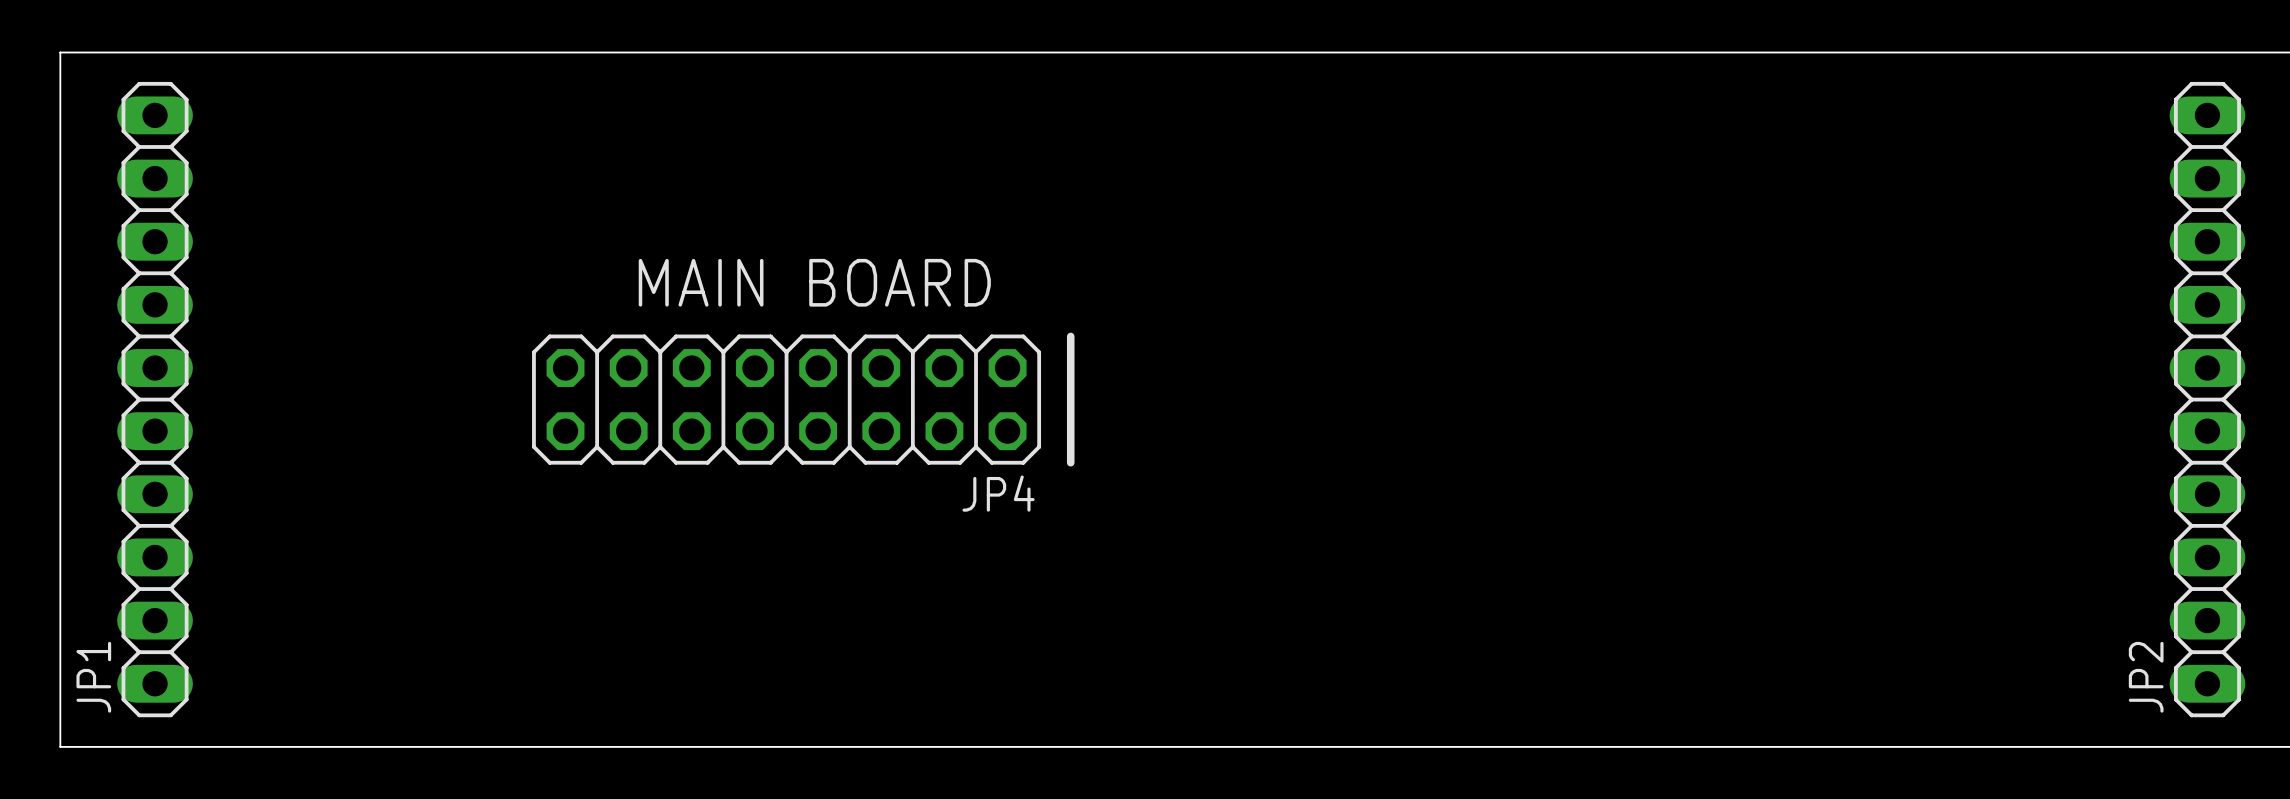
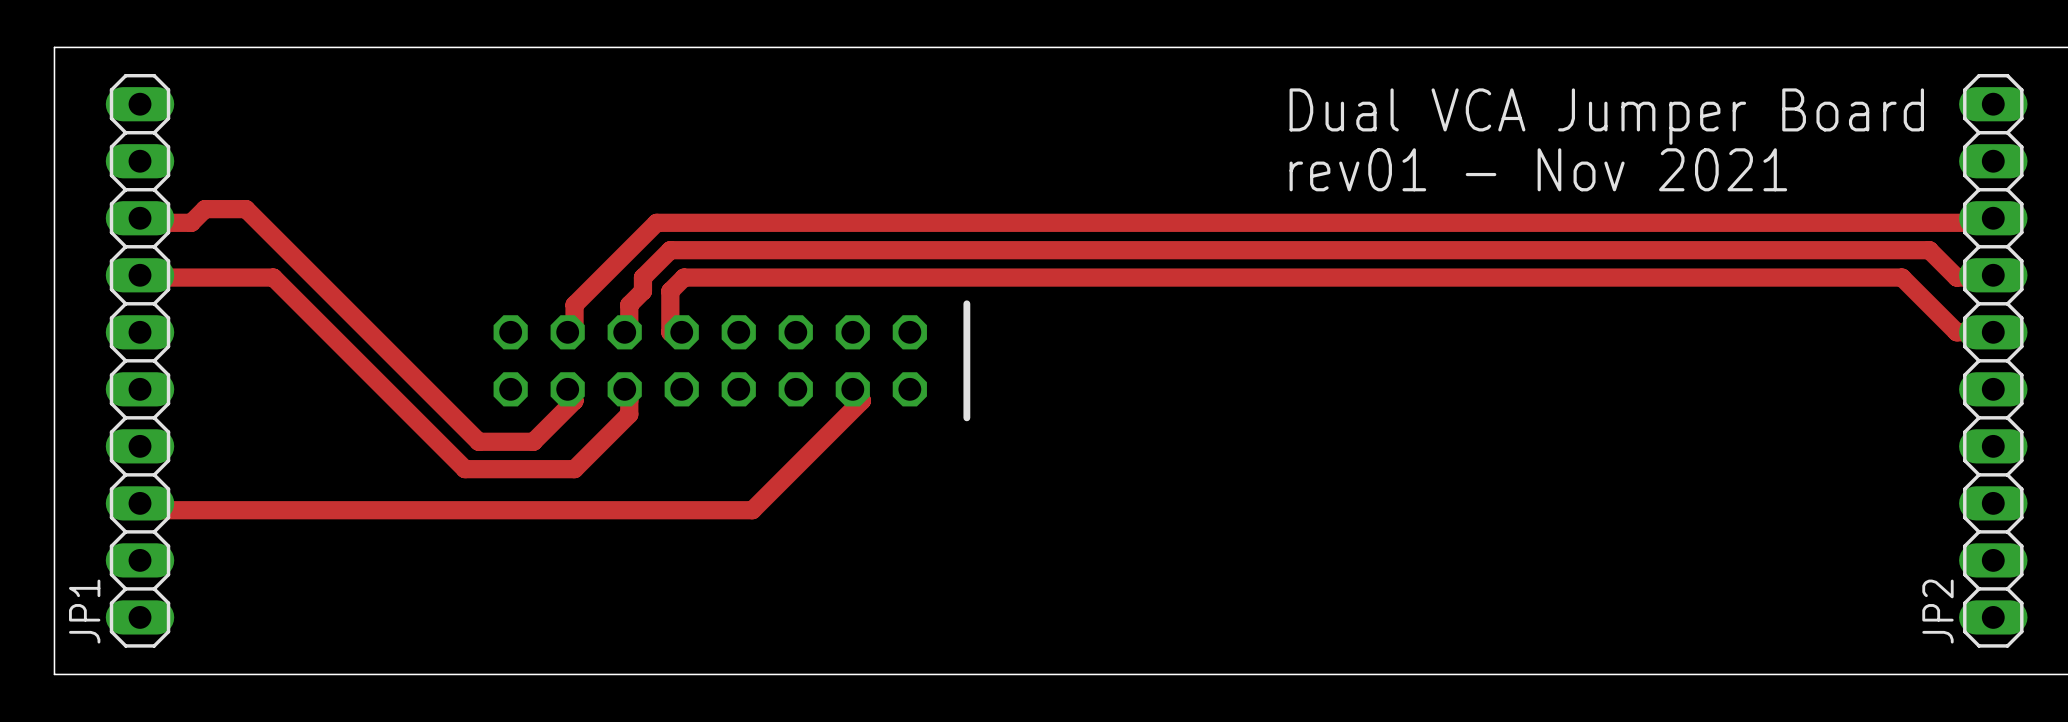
text: none -> Dual VCA Jumper Board (1606, 116)
text: none -> rev01 - Nov 2021 (1538, 169)
track: none -> (140, 218) (150, 222) (191, 222) (205, 209) (246, 209) (478, 441) (533, 441) (574, 400) (567, 389)
track: none -> (1993, 218) (1984, 222) (656, 222) (574, 304) (574, 332) (567, 332)
text: MAIN BOARD (814, 282) -> none
track: none -> (140, 275) (150, 277) (273, 277) (465, 469) (574, 469) (629, 414) (629, 400) (624, 389)
track: none -> (1993, 275) (1984, 277) (1956, 277) (1929, 250) (670, 250) (642, 277) (642, 291) (629, 304) (629, 332) (624, 332)
track: none -> (681, 332) (670, 332) (670, 291) (684, 277) (1902, 277) (1956, 332) (1993, 332)
JP4 side: top (786, 399) -> bottom (710, 360)
track: none -> (852, 389) (861, 400) (752, 510) (150, 510) (140, 503)

